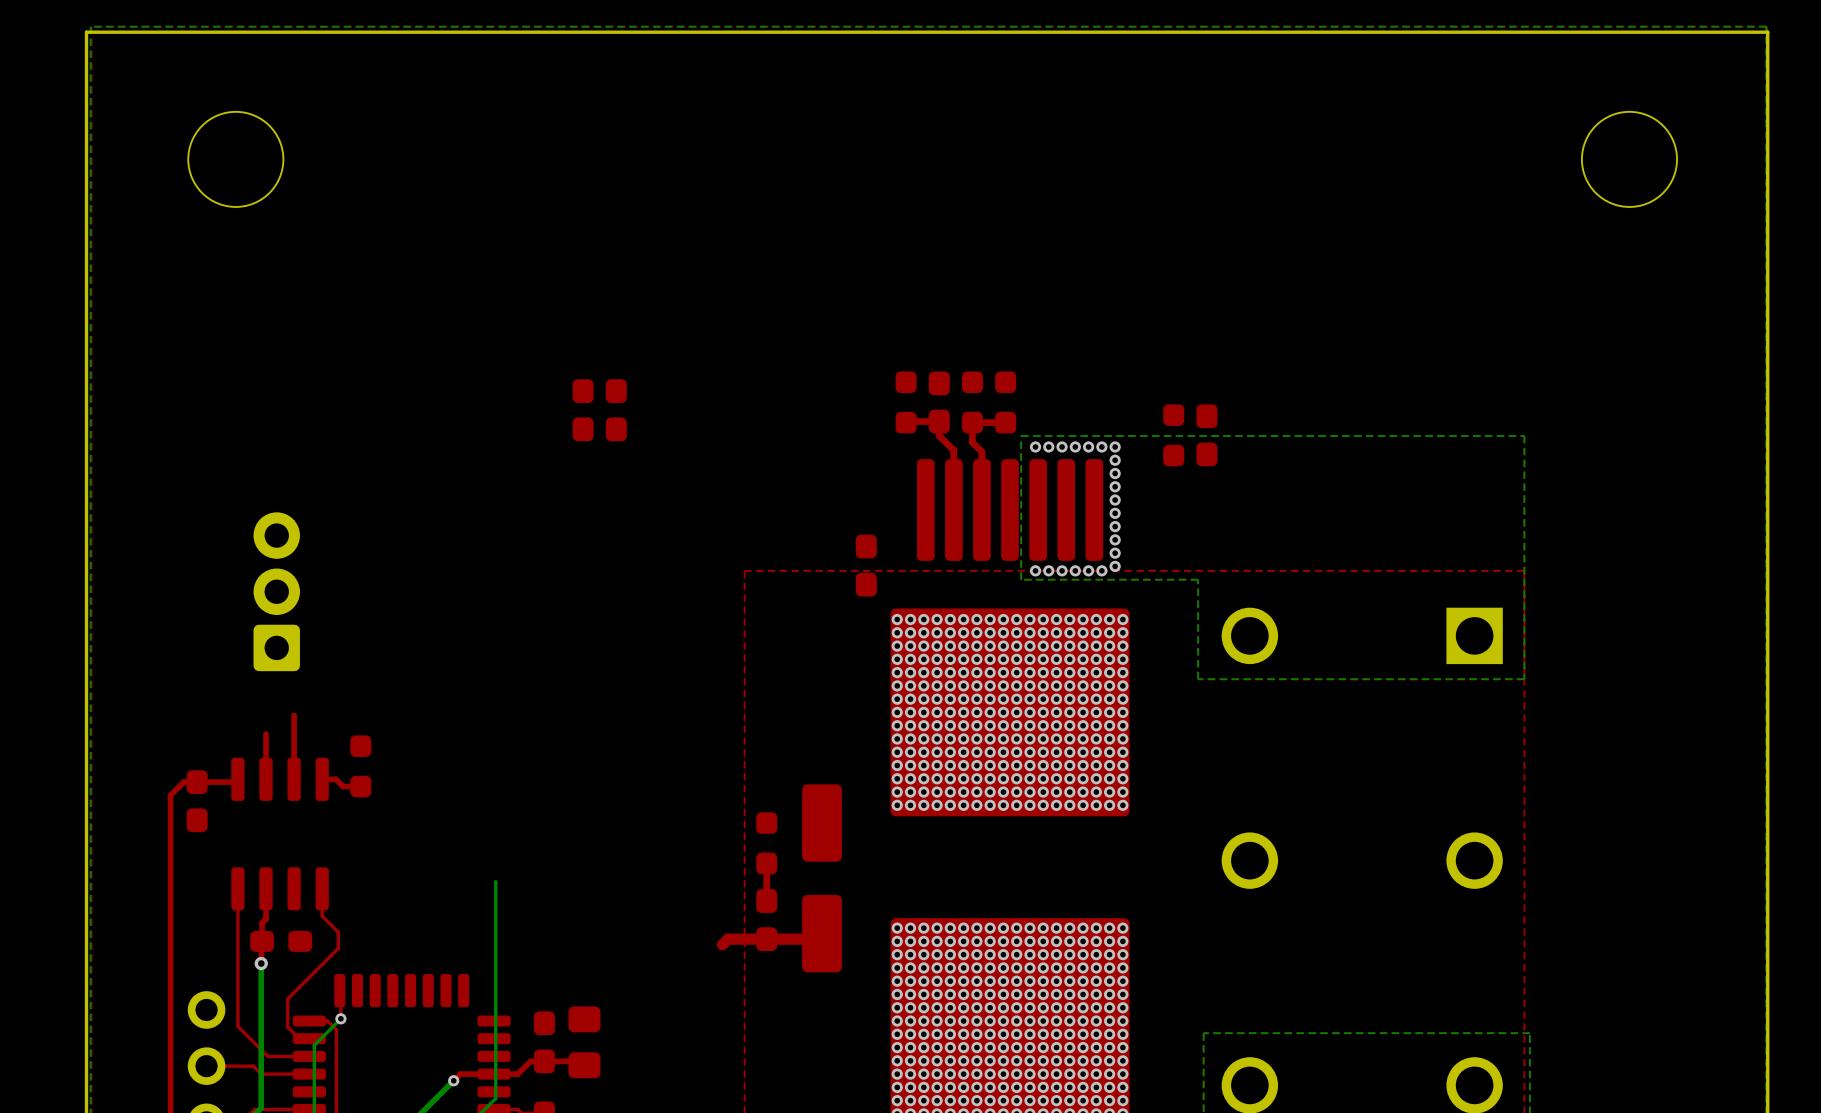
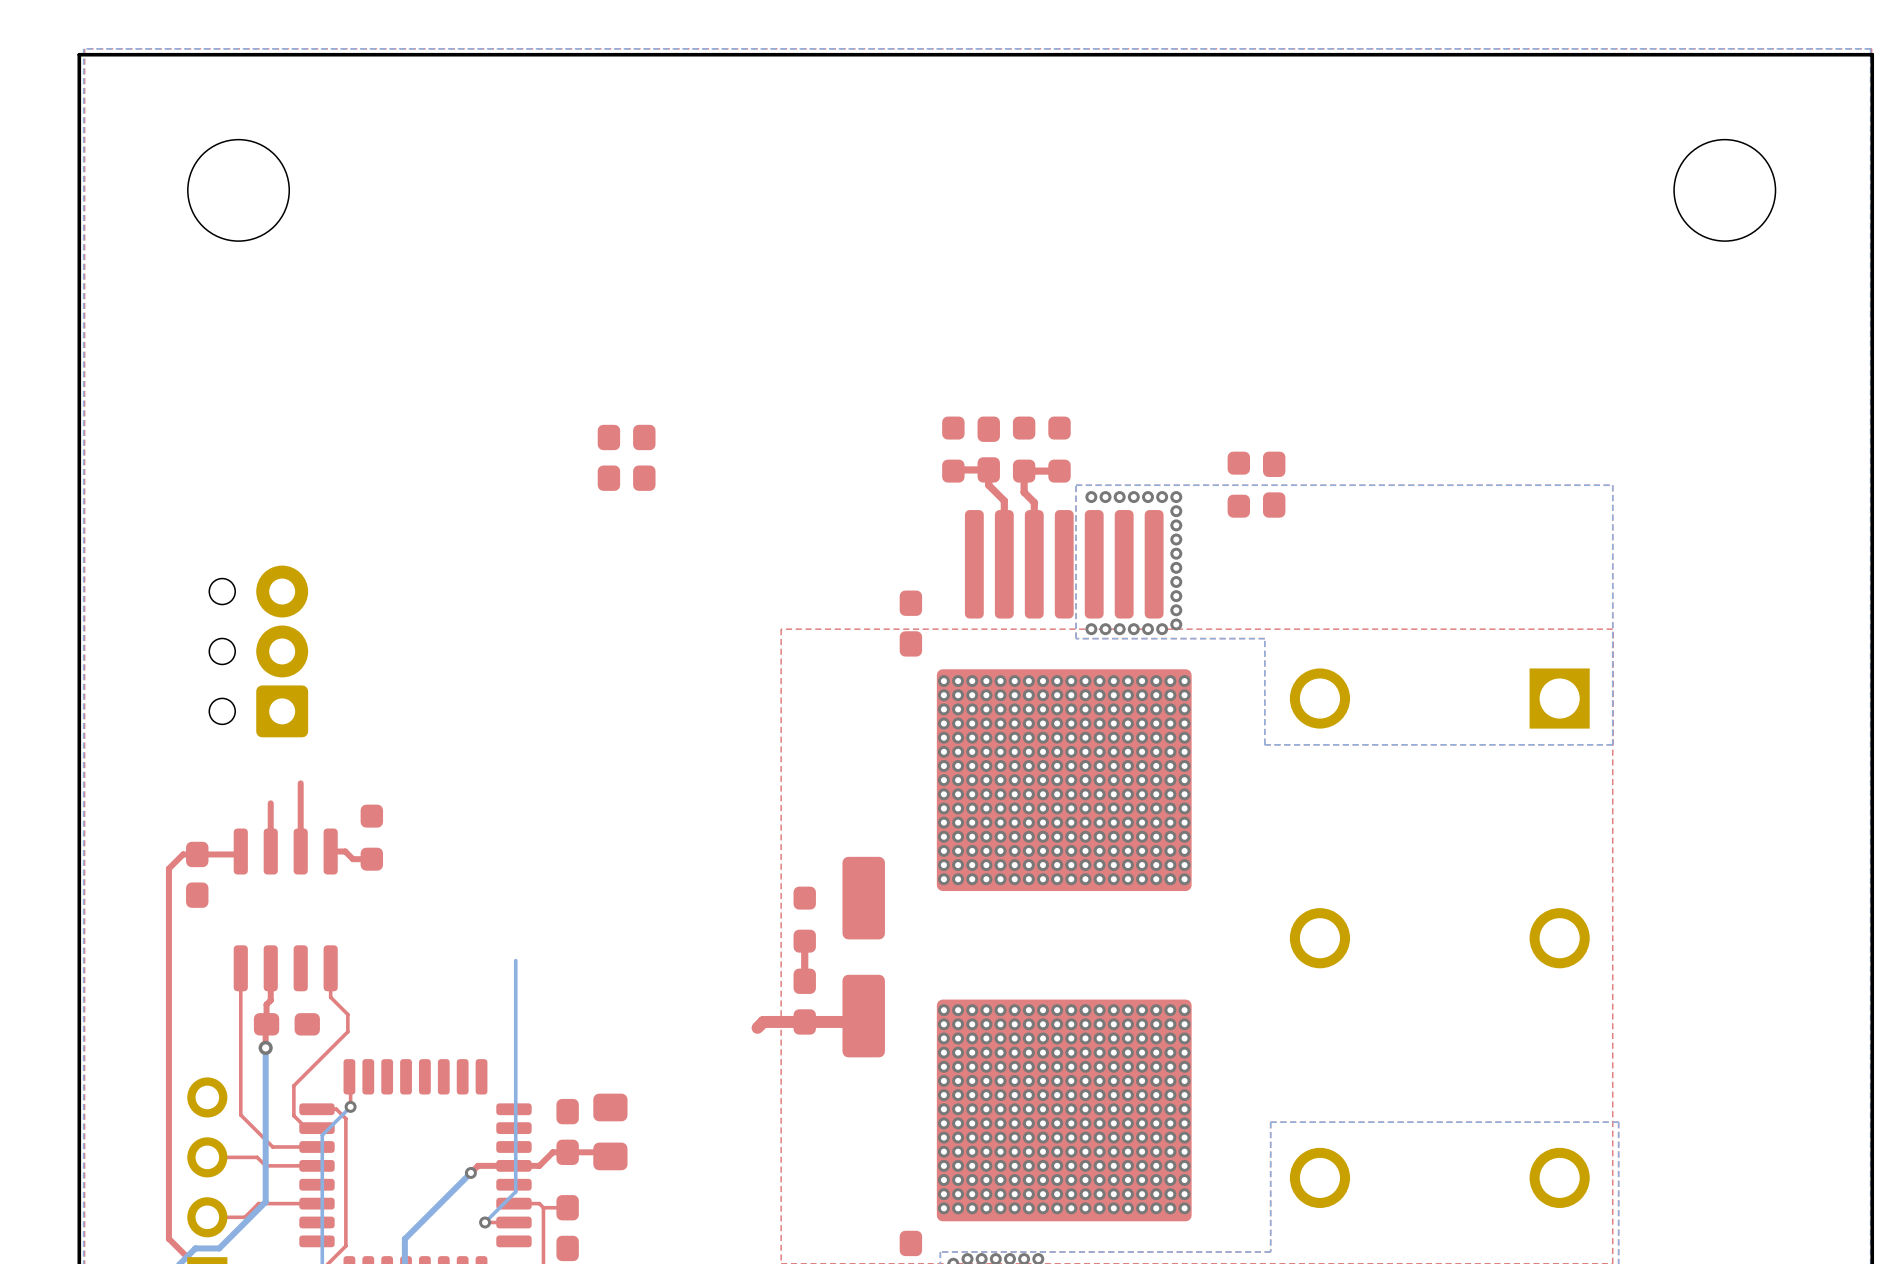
part footprint: [253, 512, 300, 672] -> [209, 565, 309, 738]

